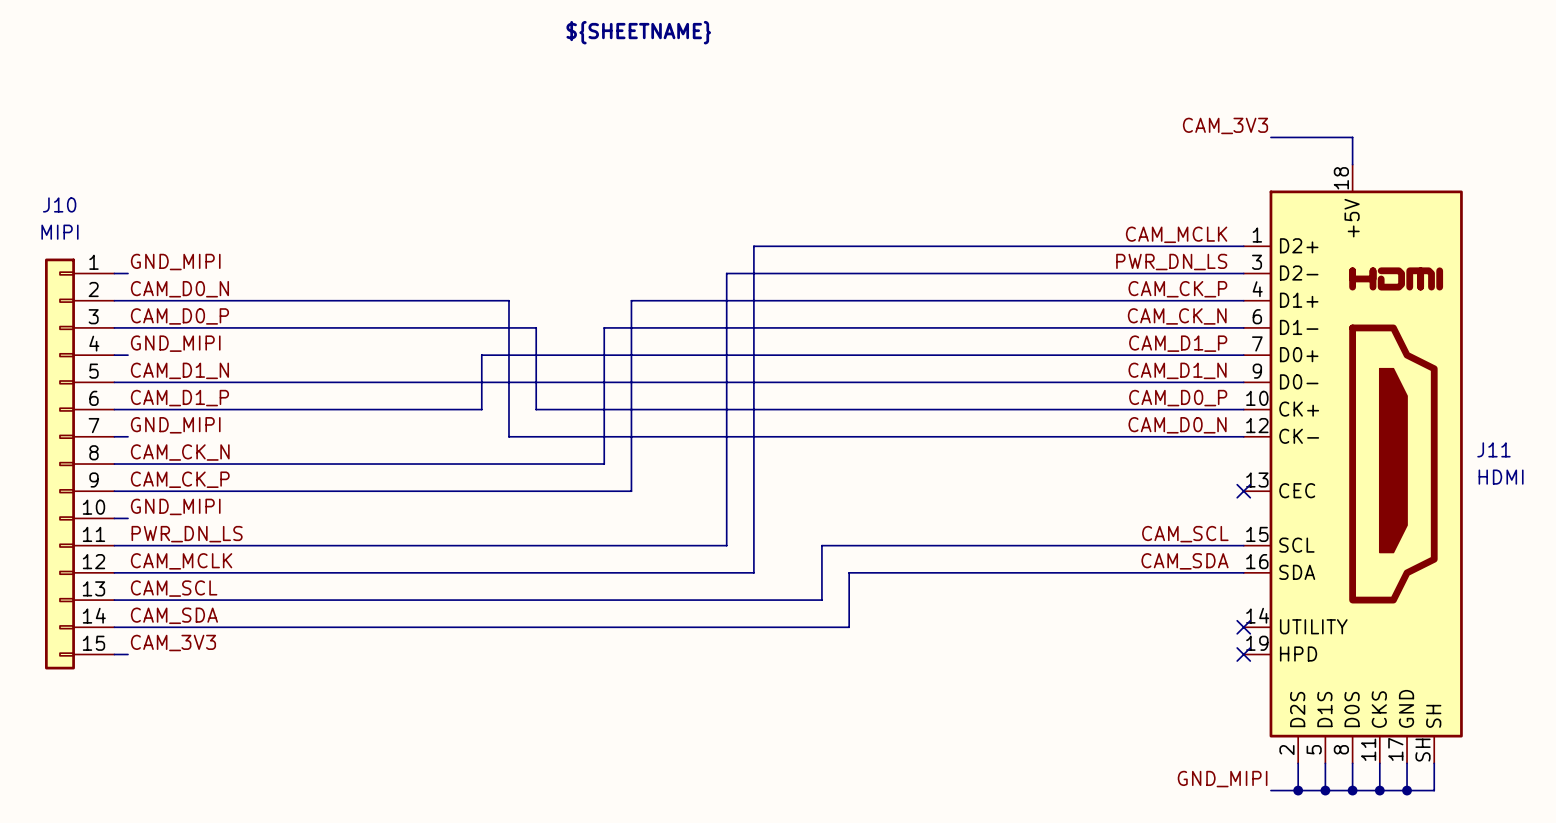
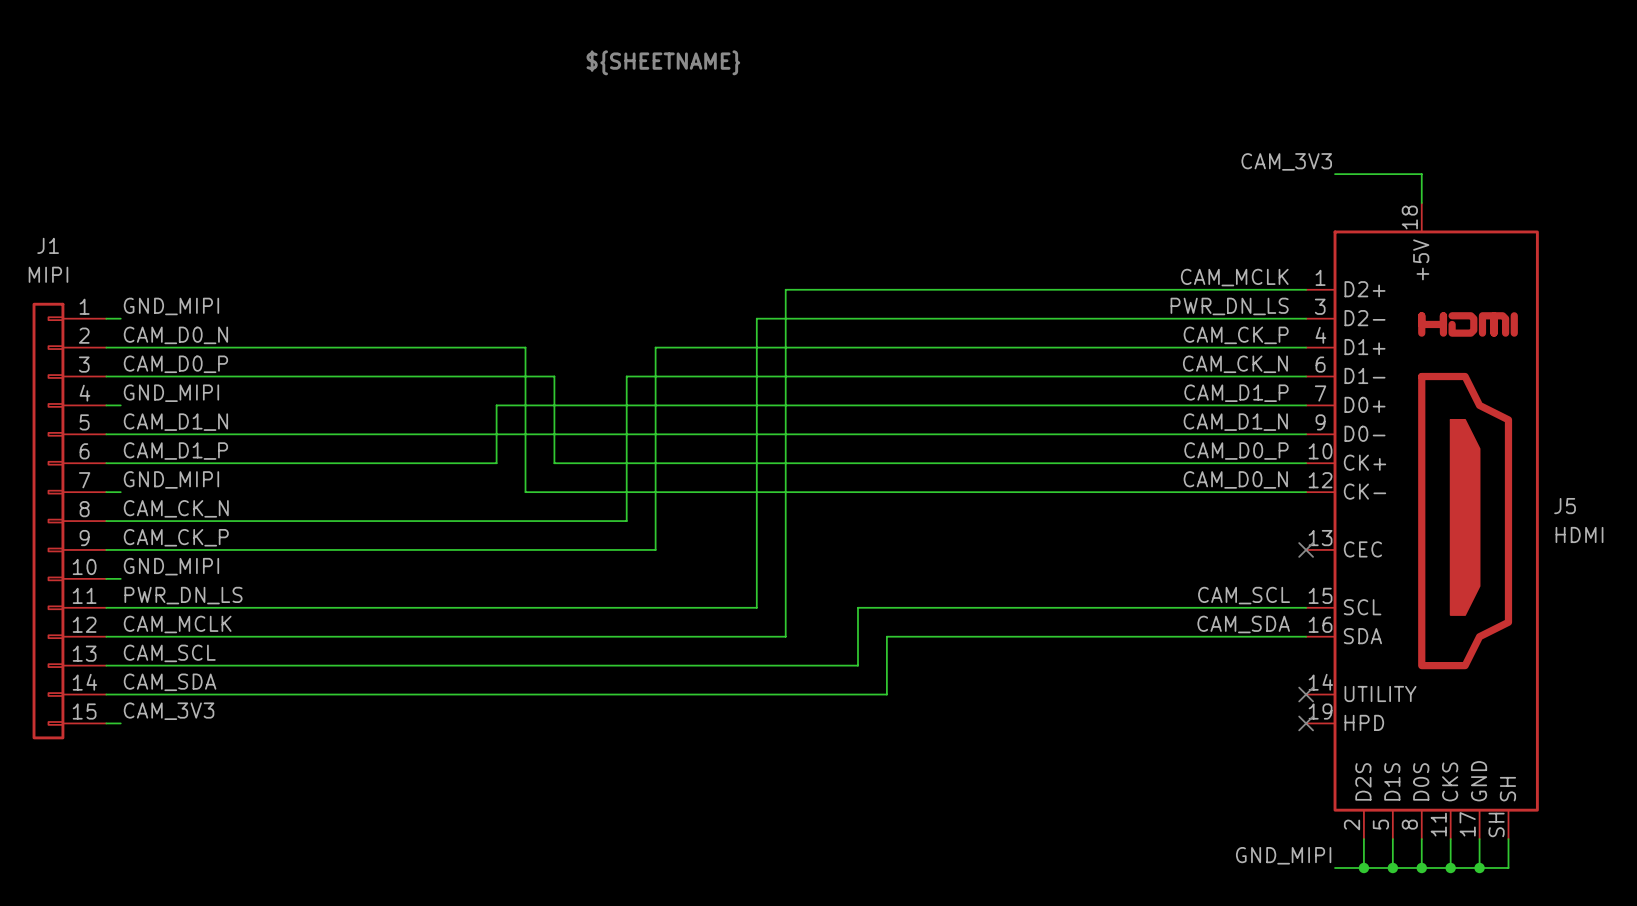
J10 name: J10 (59, 204) -> J1 (48, 245)
J11 name: J11 (1493, 449) -> J5 (1565, 506)

